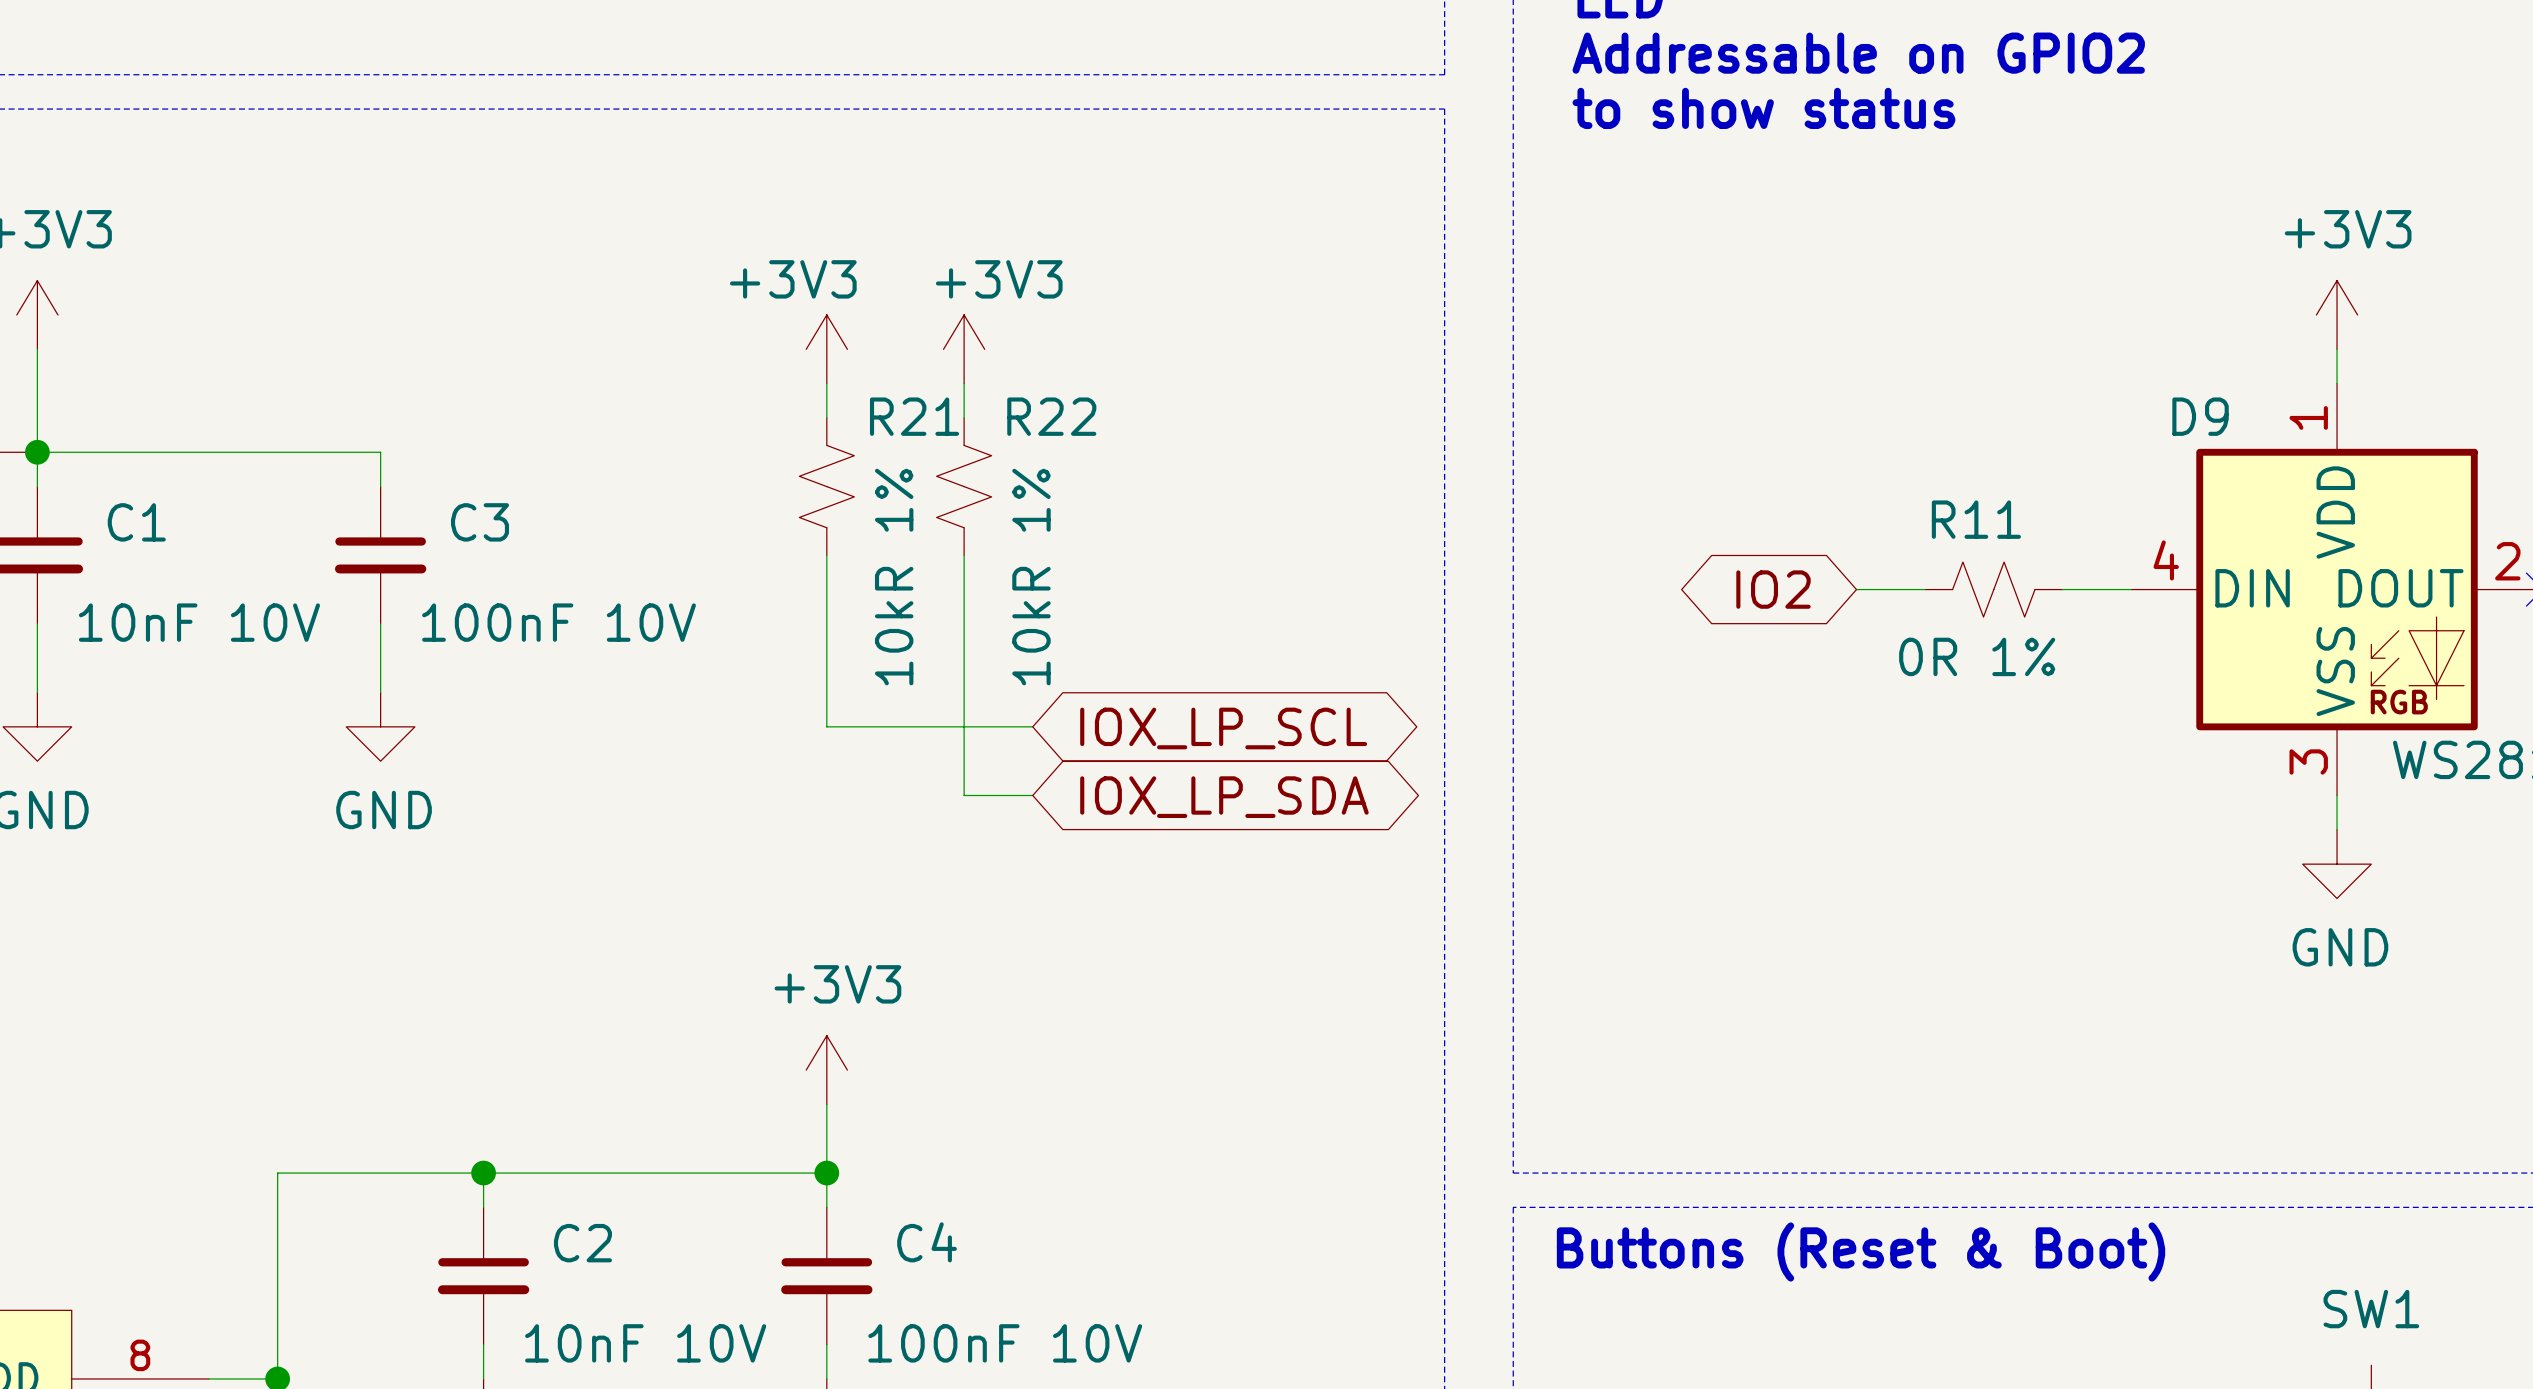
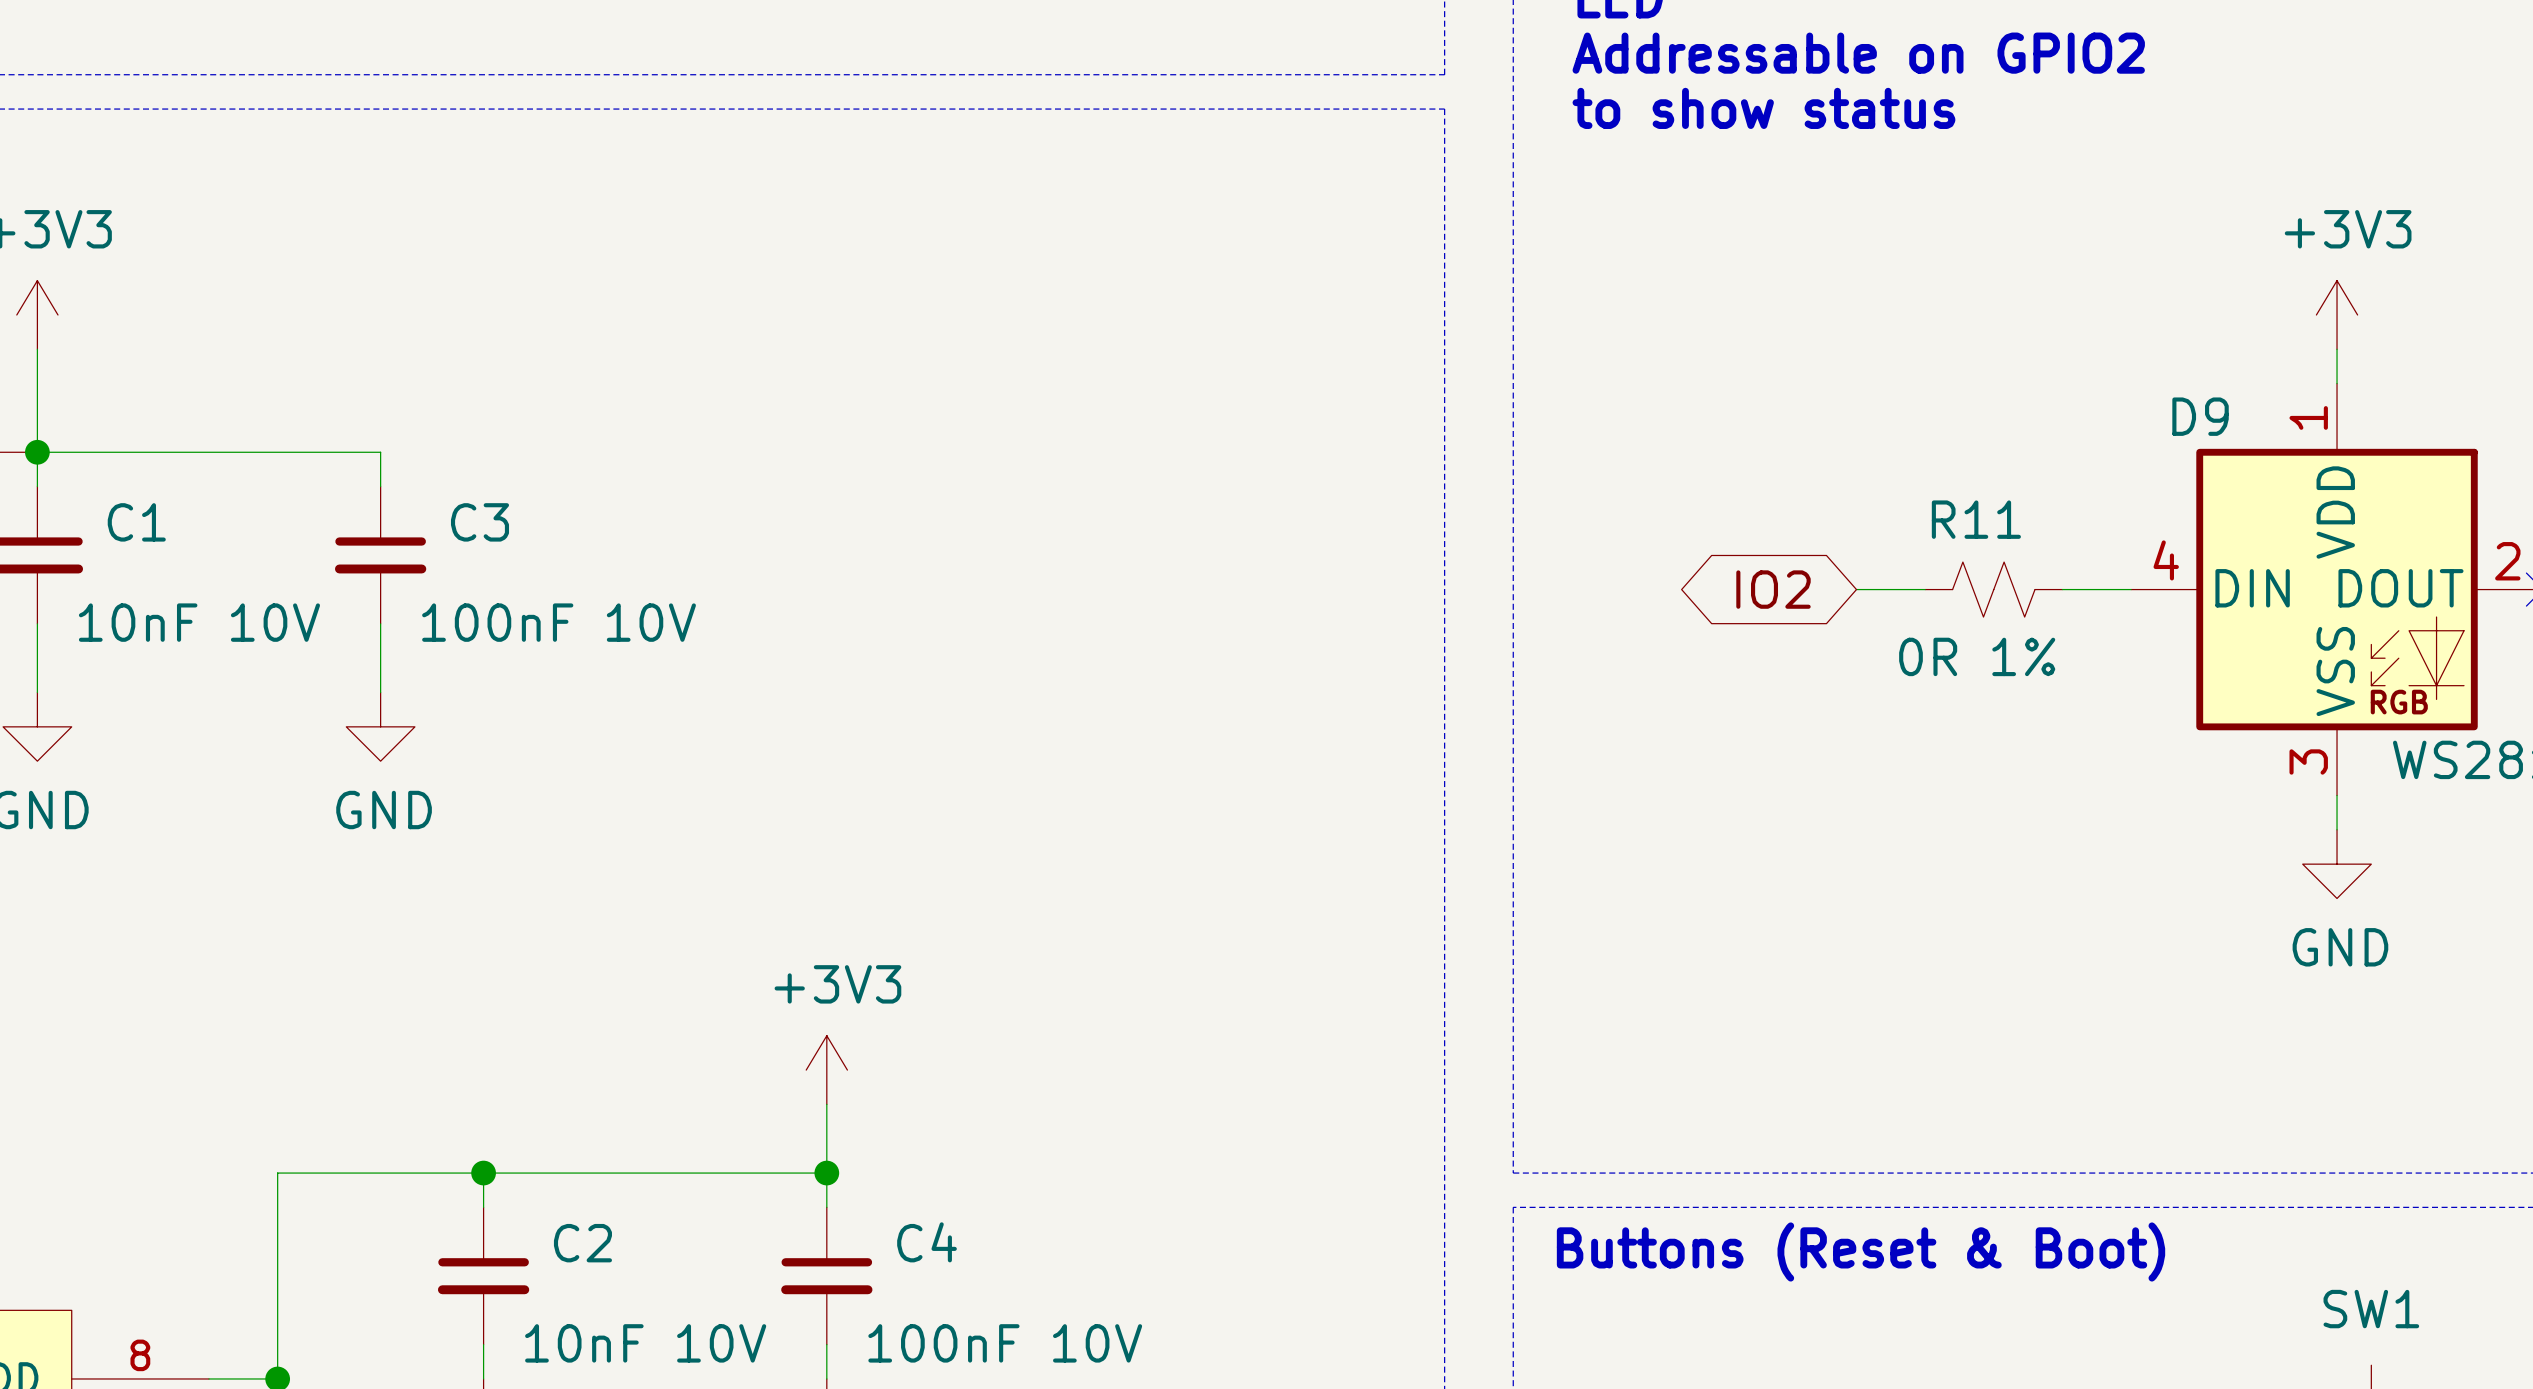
power symbol: +3V3 (826, 349) -> none
power symbol: +3V3 (964, 349) -> none
wire: (826, 383) (826, 417) -> none
wire: (964, 383) (964, 417) -> none
R21: 10kR 1% (826, 486) -> none
R22: 10kR 1% (964, 486) -> none
wire: (826, 555) (826, 726) (1032, 726) -> none
wire: (964, 555) (964, 795) (1032, 795) -> none
global label: IOX_LP_SCL (1223, 728) -> none
global label: IOX_LP_SDA (1224, 797) -> none

